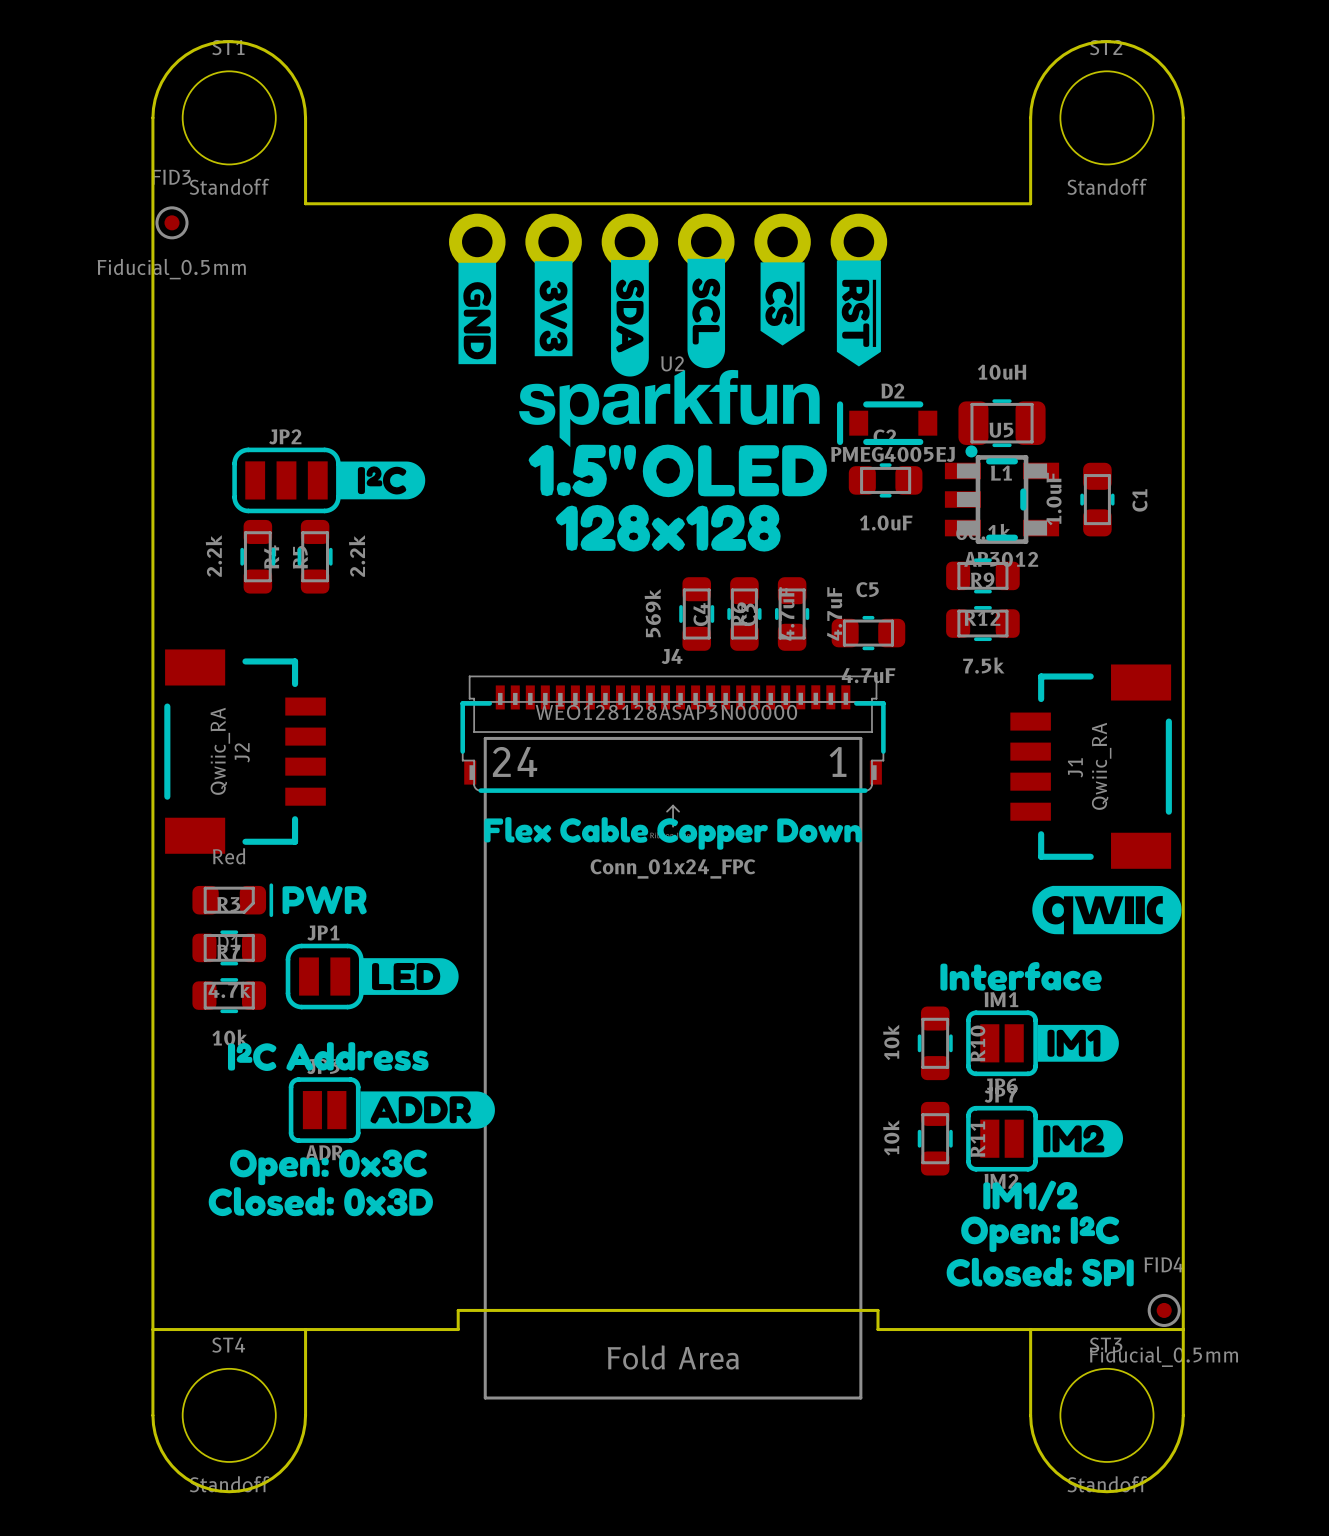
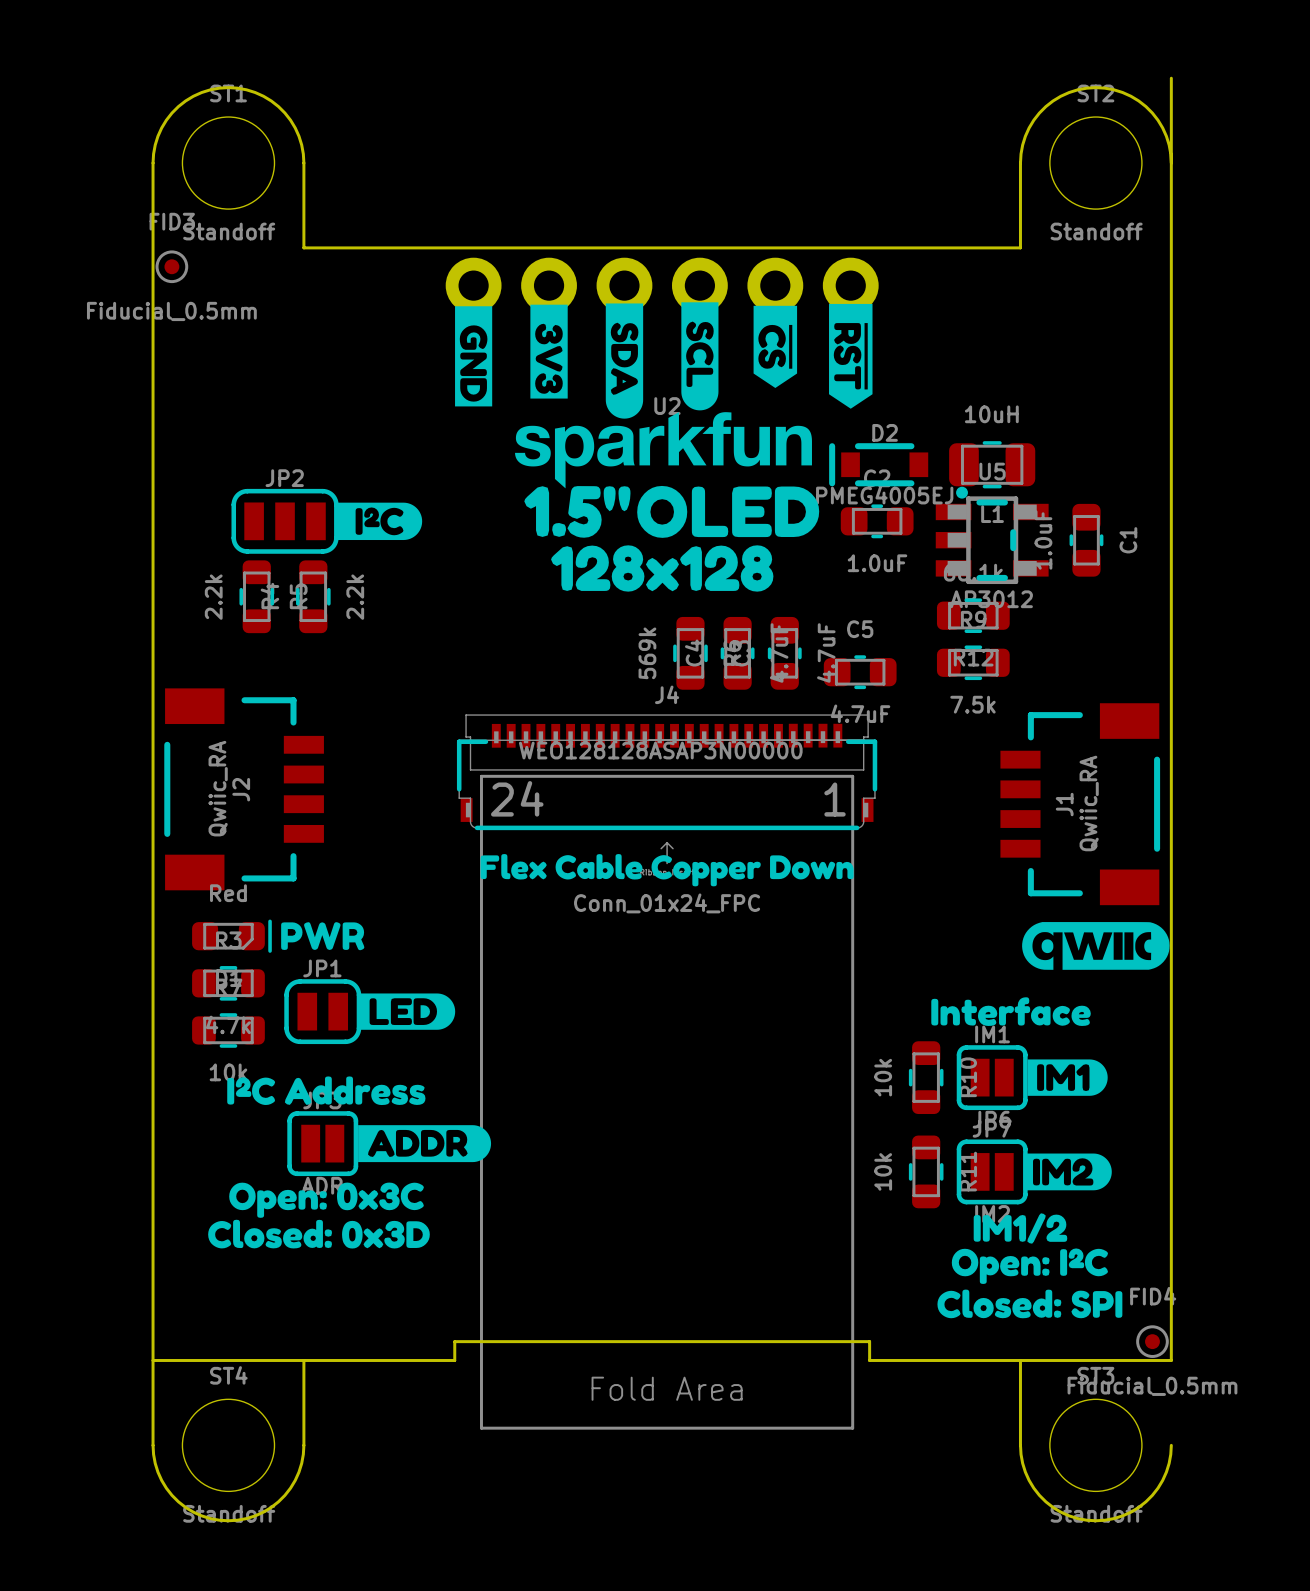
board edge: none -> (1171, 78) (1171, 163)
board edge: (1183, 1329) (1183, 1415) -> none

